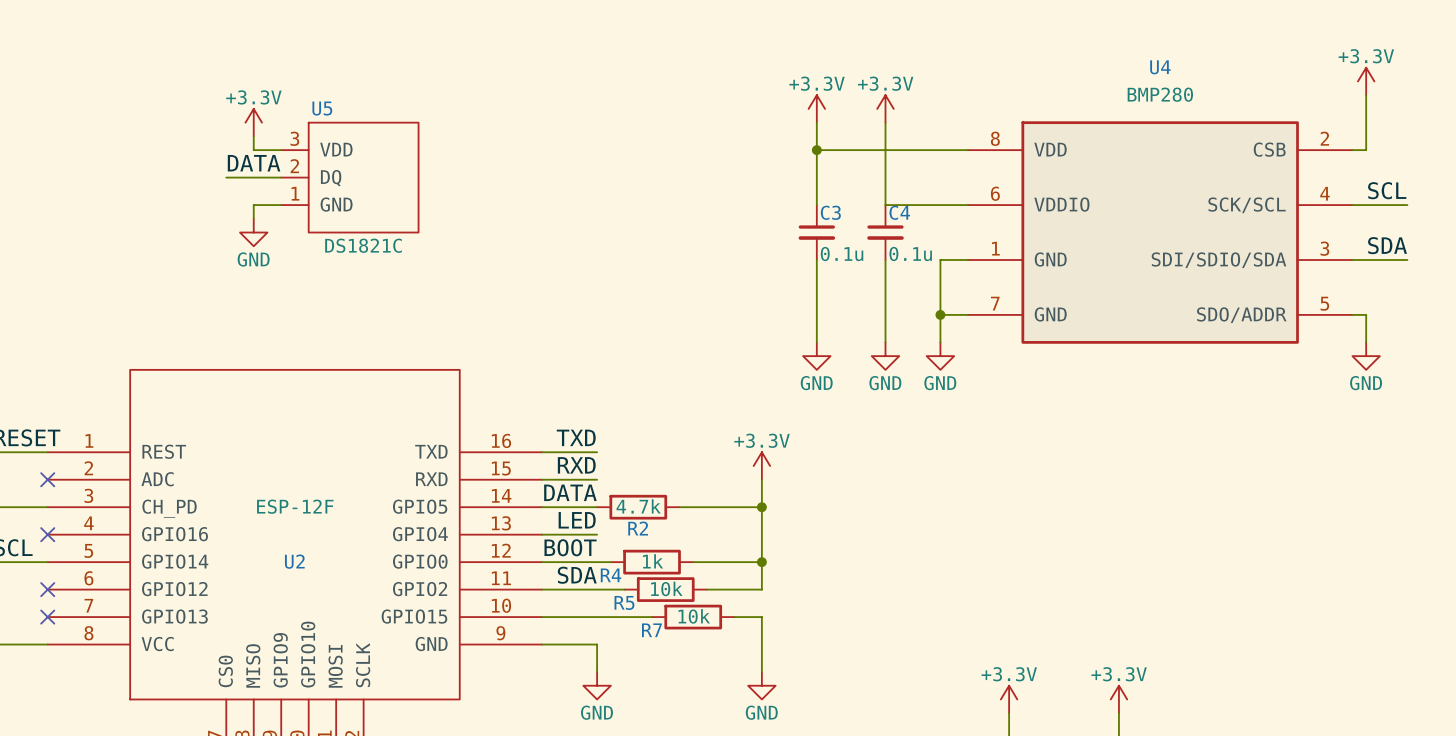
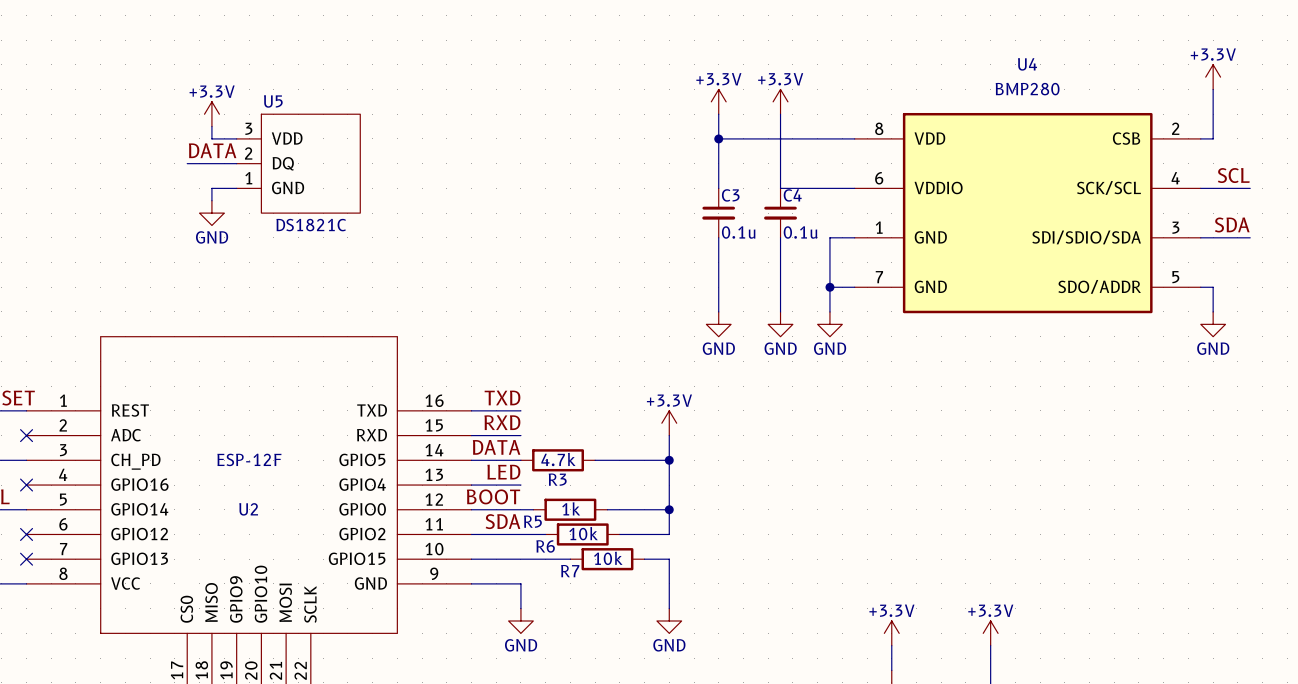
R2 name: R2 (638, 528) -> R3 (557, 479)
R4 name: R4 (611, 575) -> R5 (532, 521)
R5 name: R5 (624, 602) -> R6 (545, 546)

